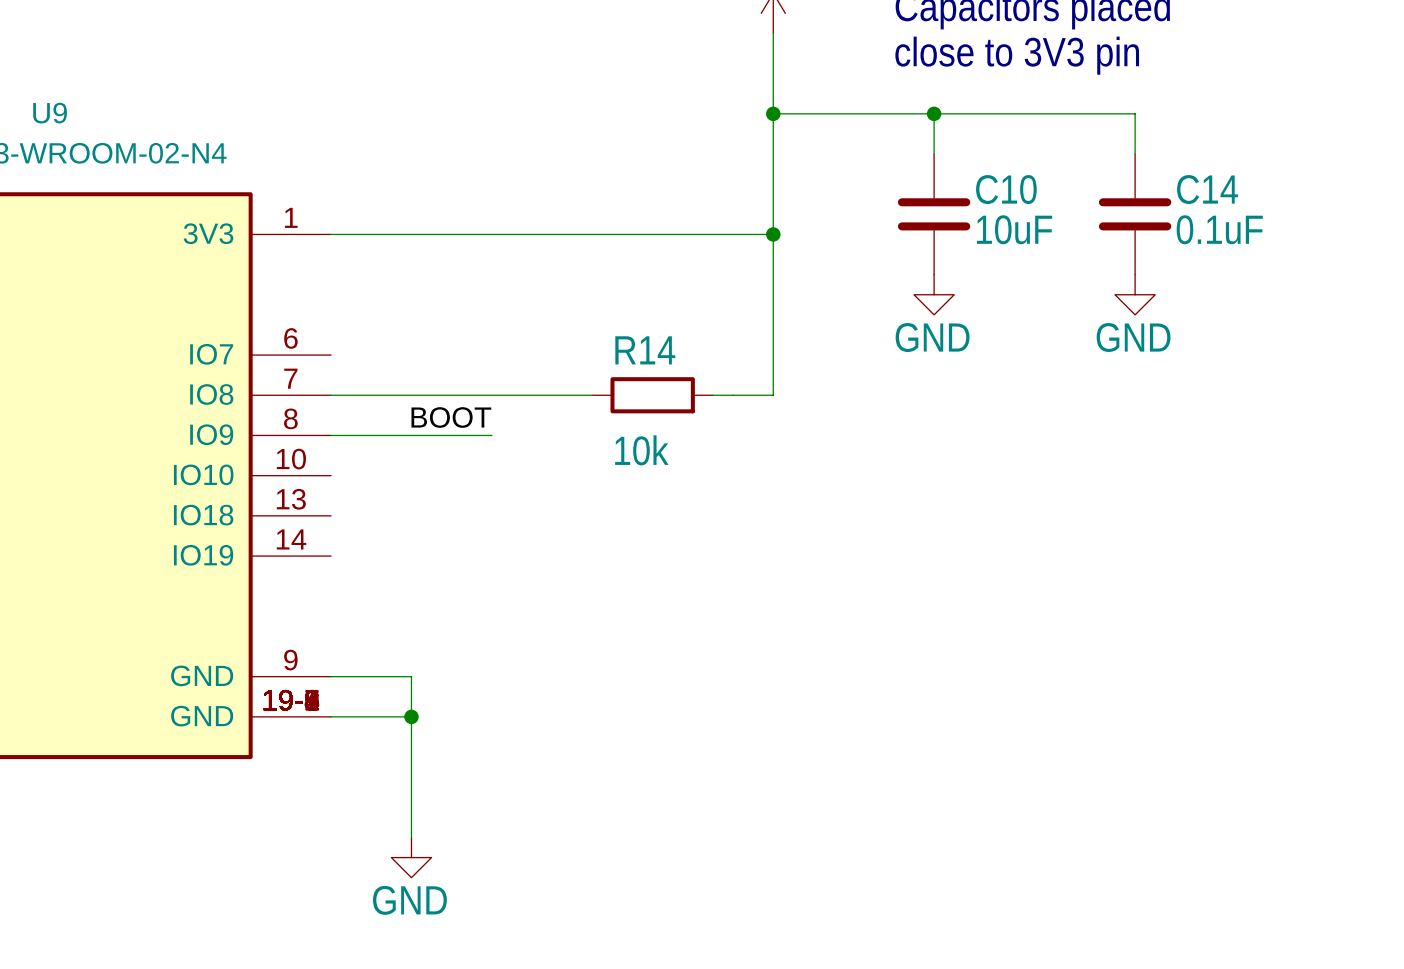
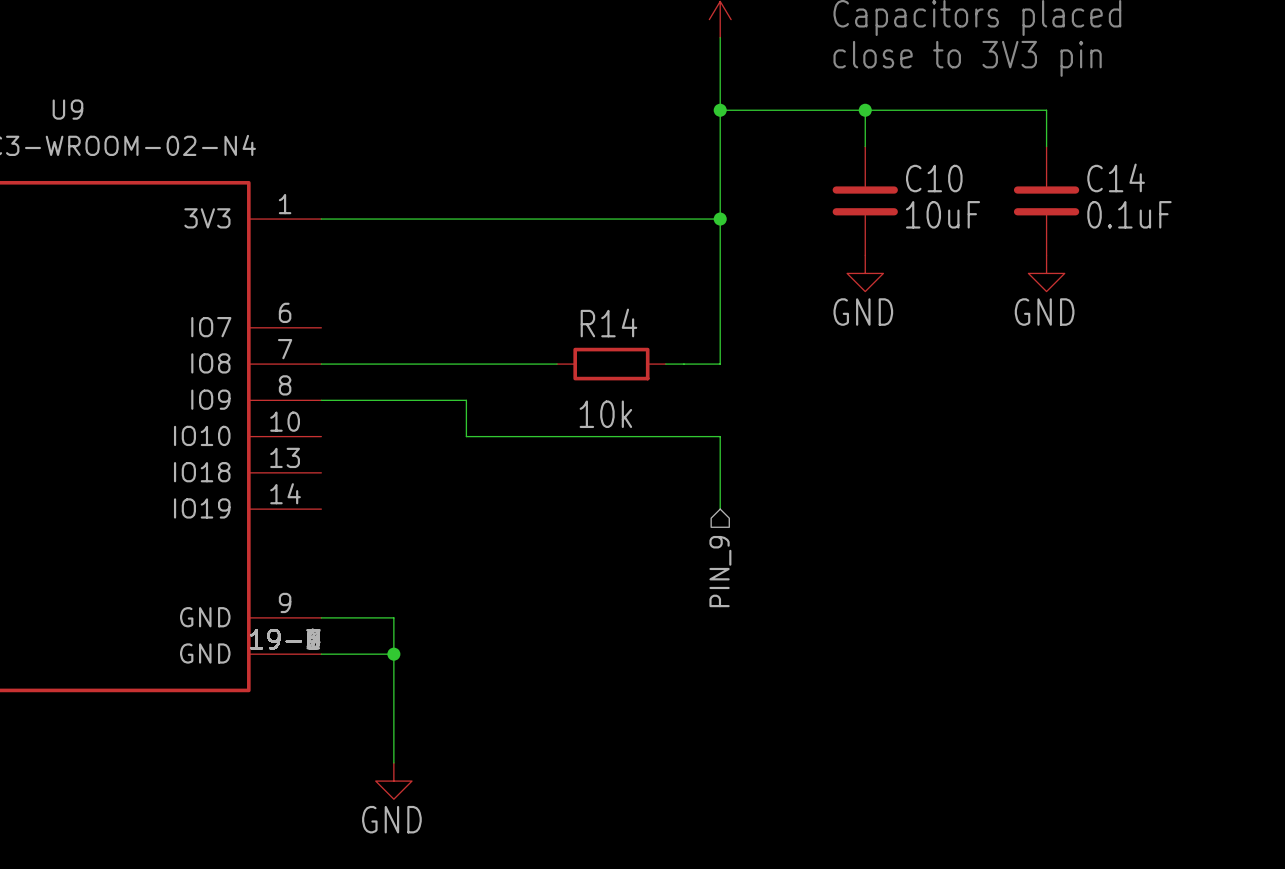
label: BOOT (451, 417) -> none
wire: none -> (466, 400) (466, 436) (720, 436) (720, 509)
hierarchical label: none -> PIN_9 (720, 571)

